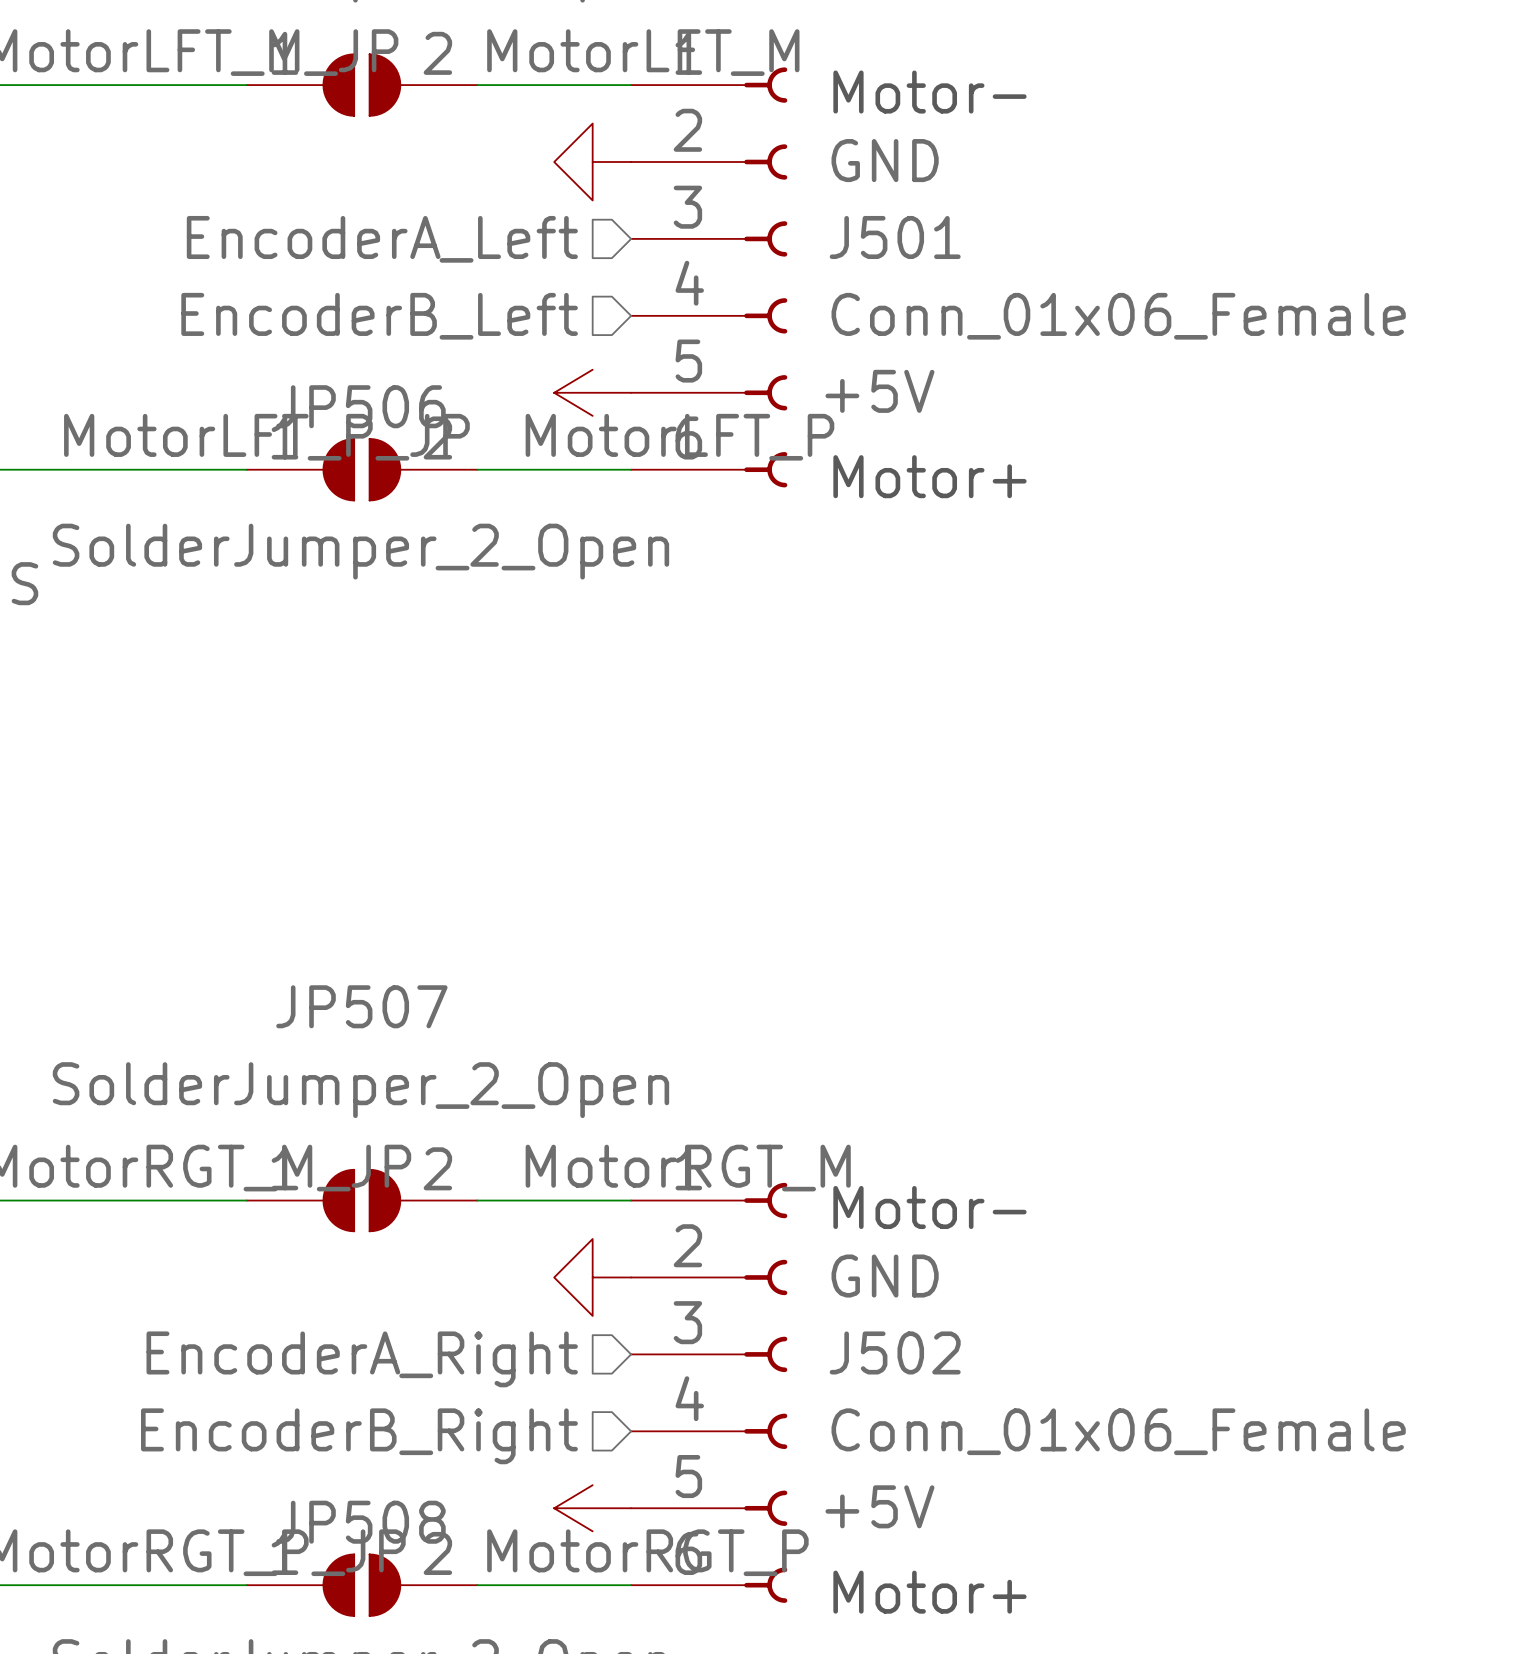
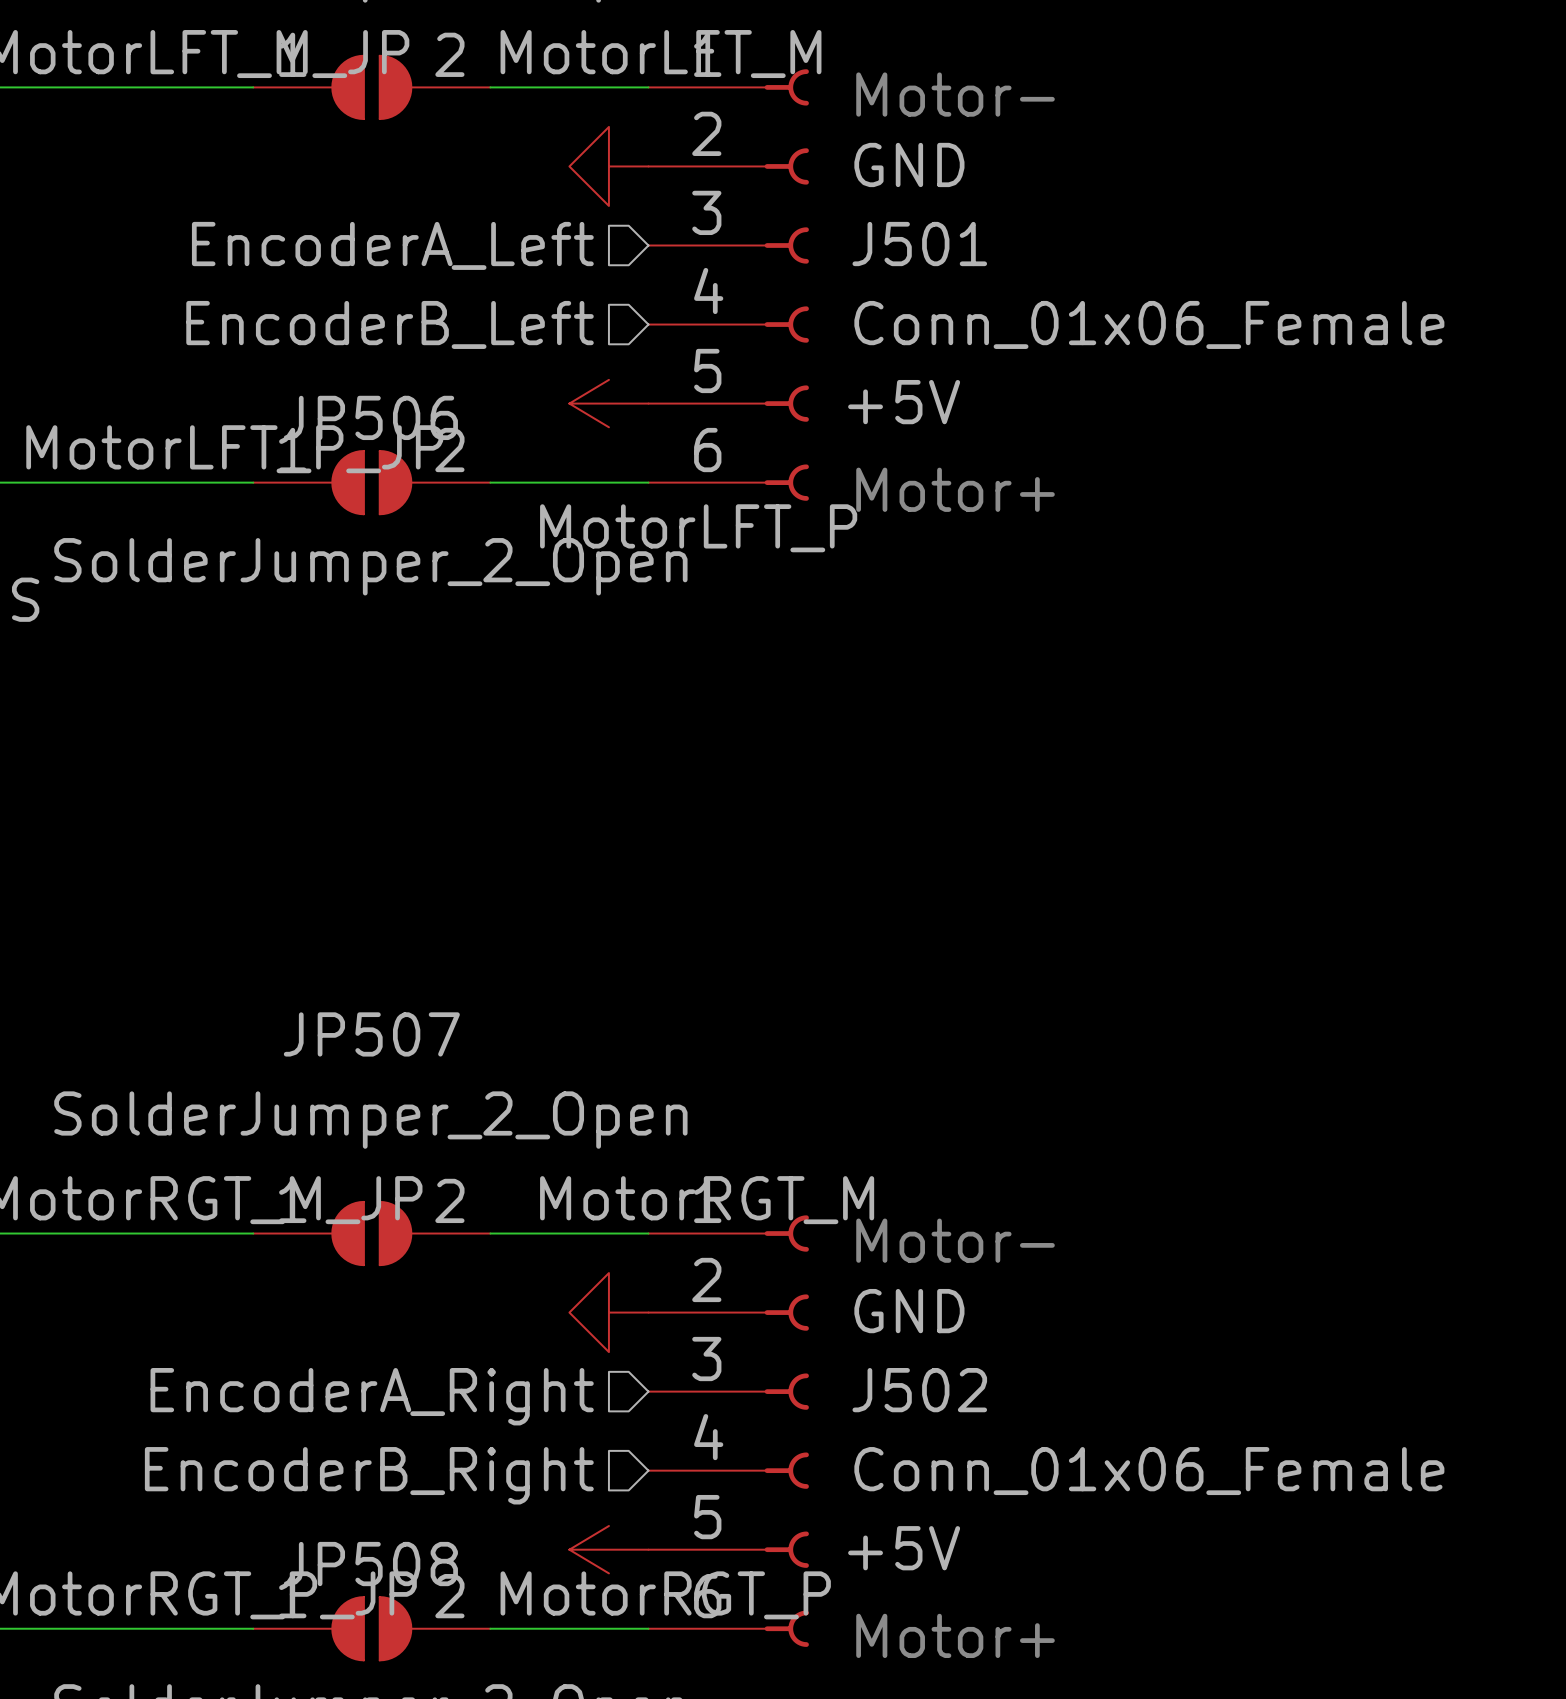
label position: MotorLFT_P_JP (266, 437) -> MotorLFT_P_JP (234, 449)
label position: MotorLFT_P (679, 437) -> MotorLFT_P (698, 528)

